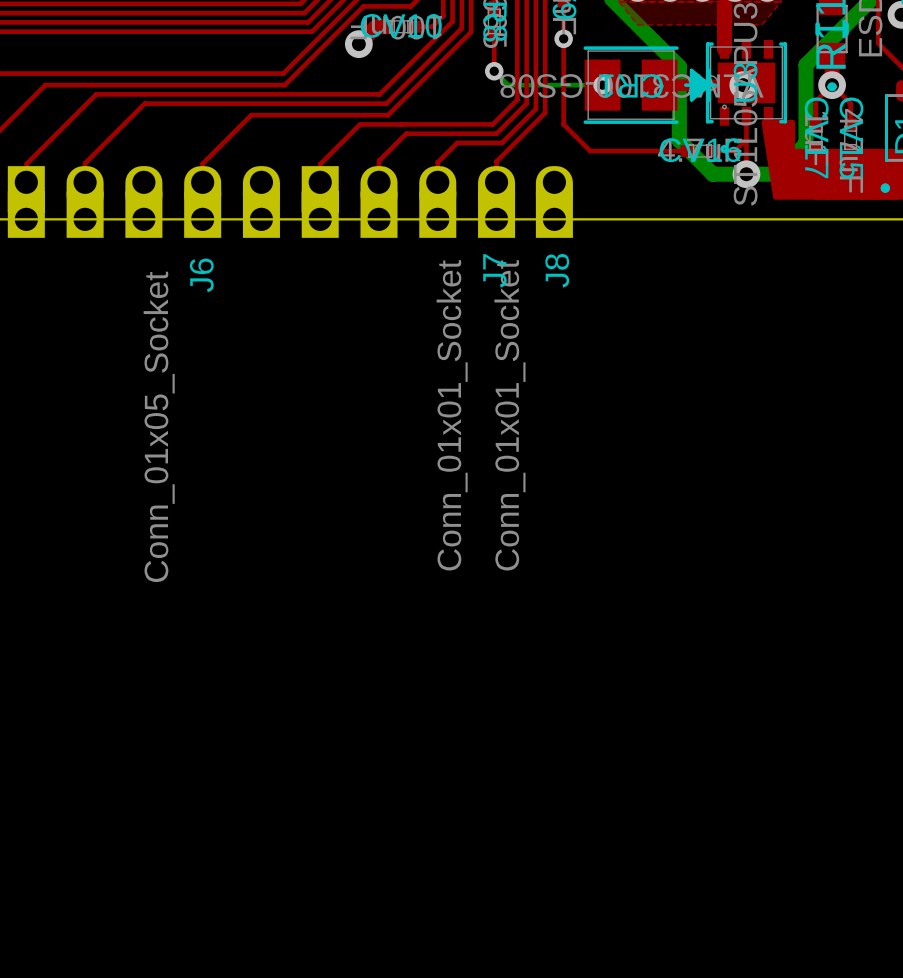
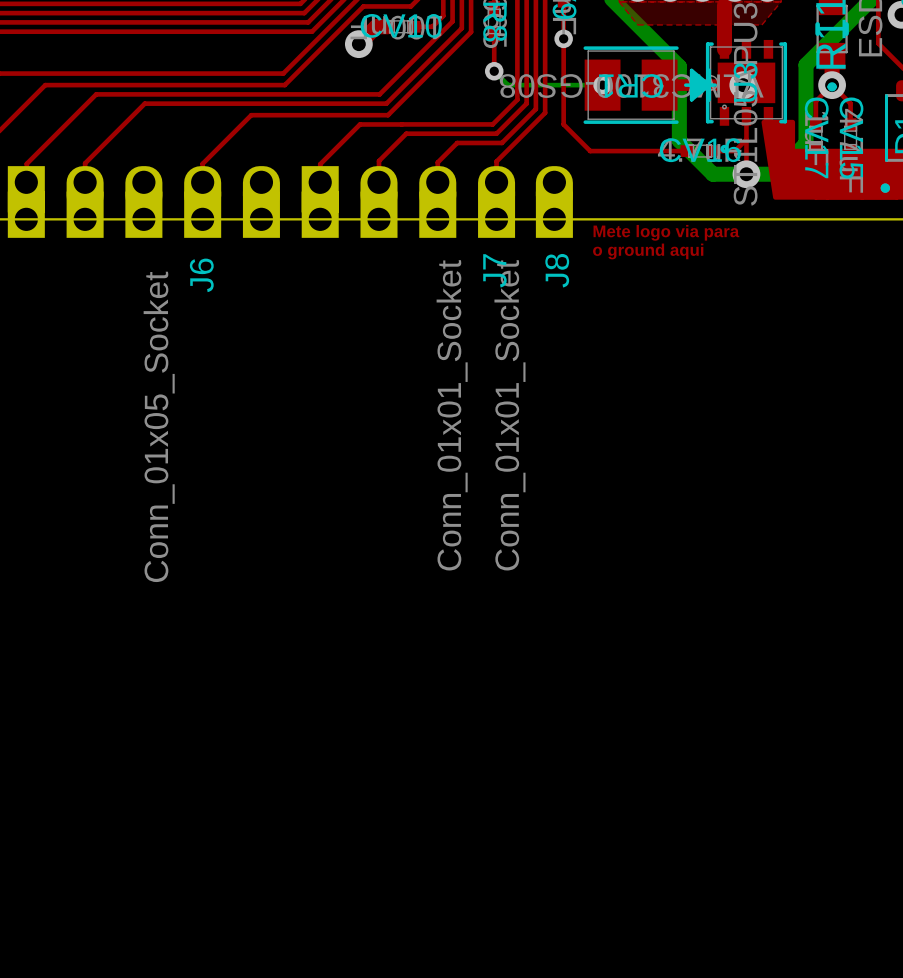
text: none -> Mete logo via para (666, 232)
text: none -> o ground aqui (648, 251)

